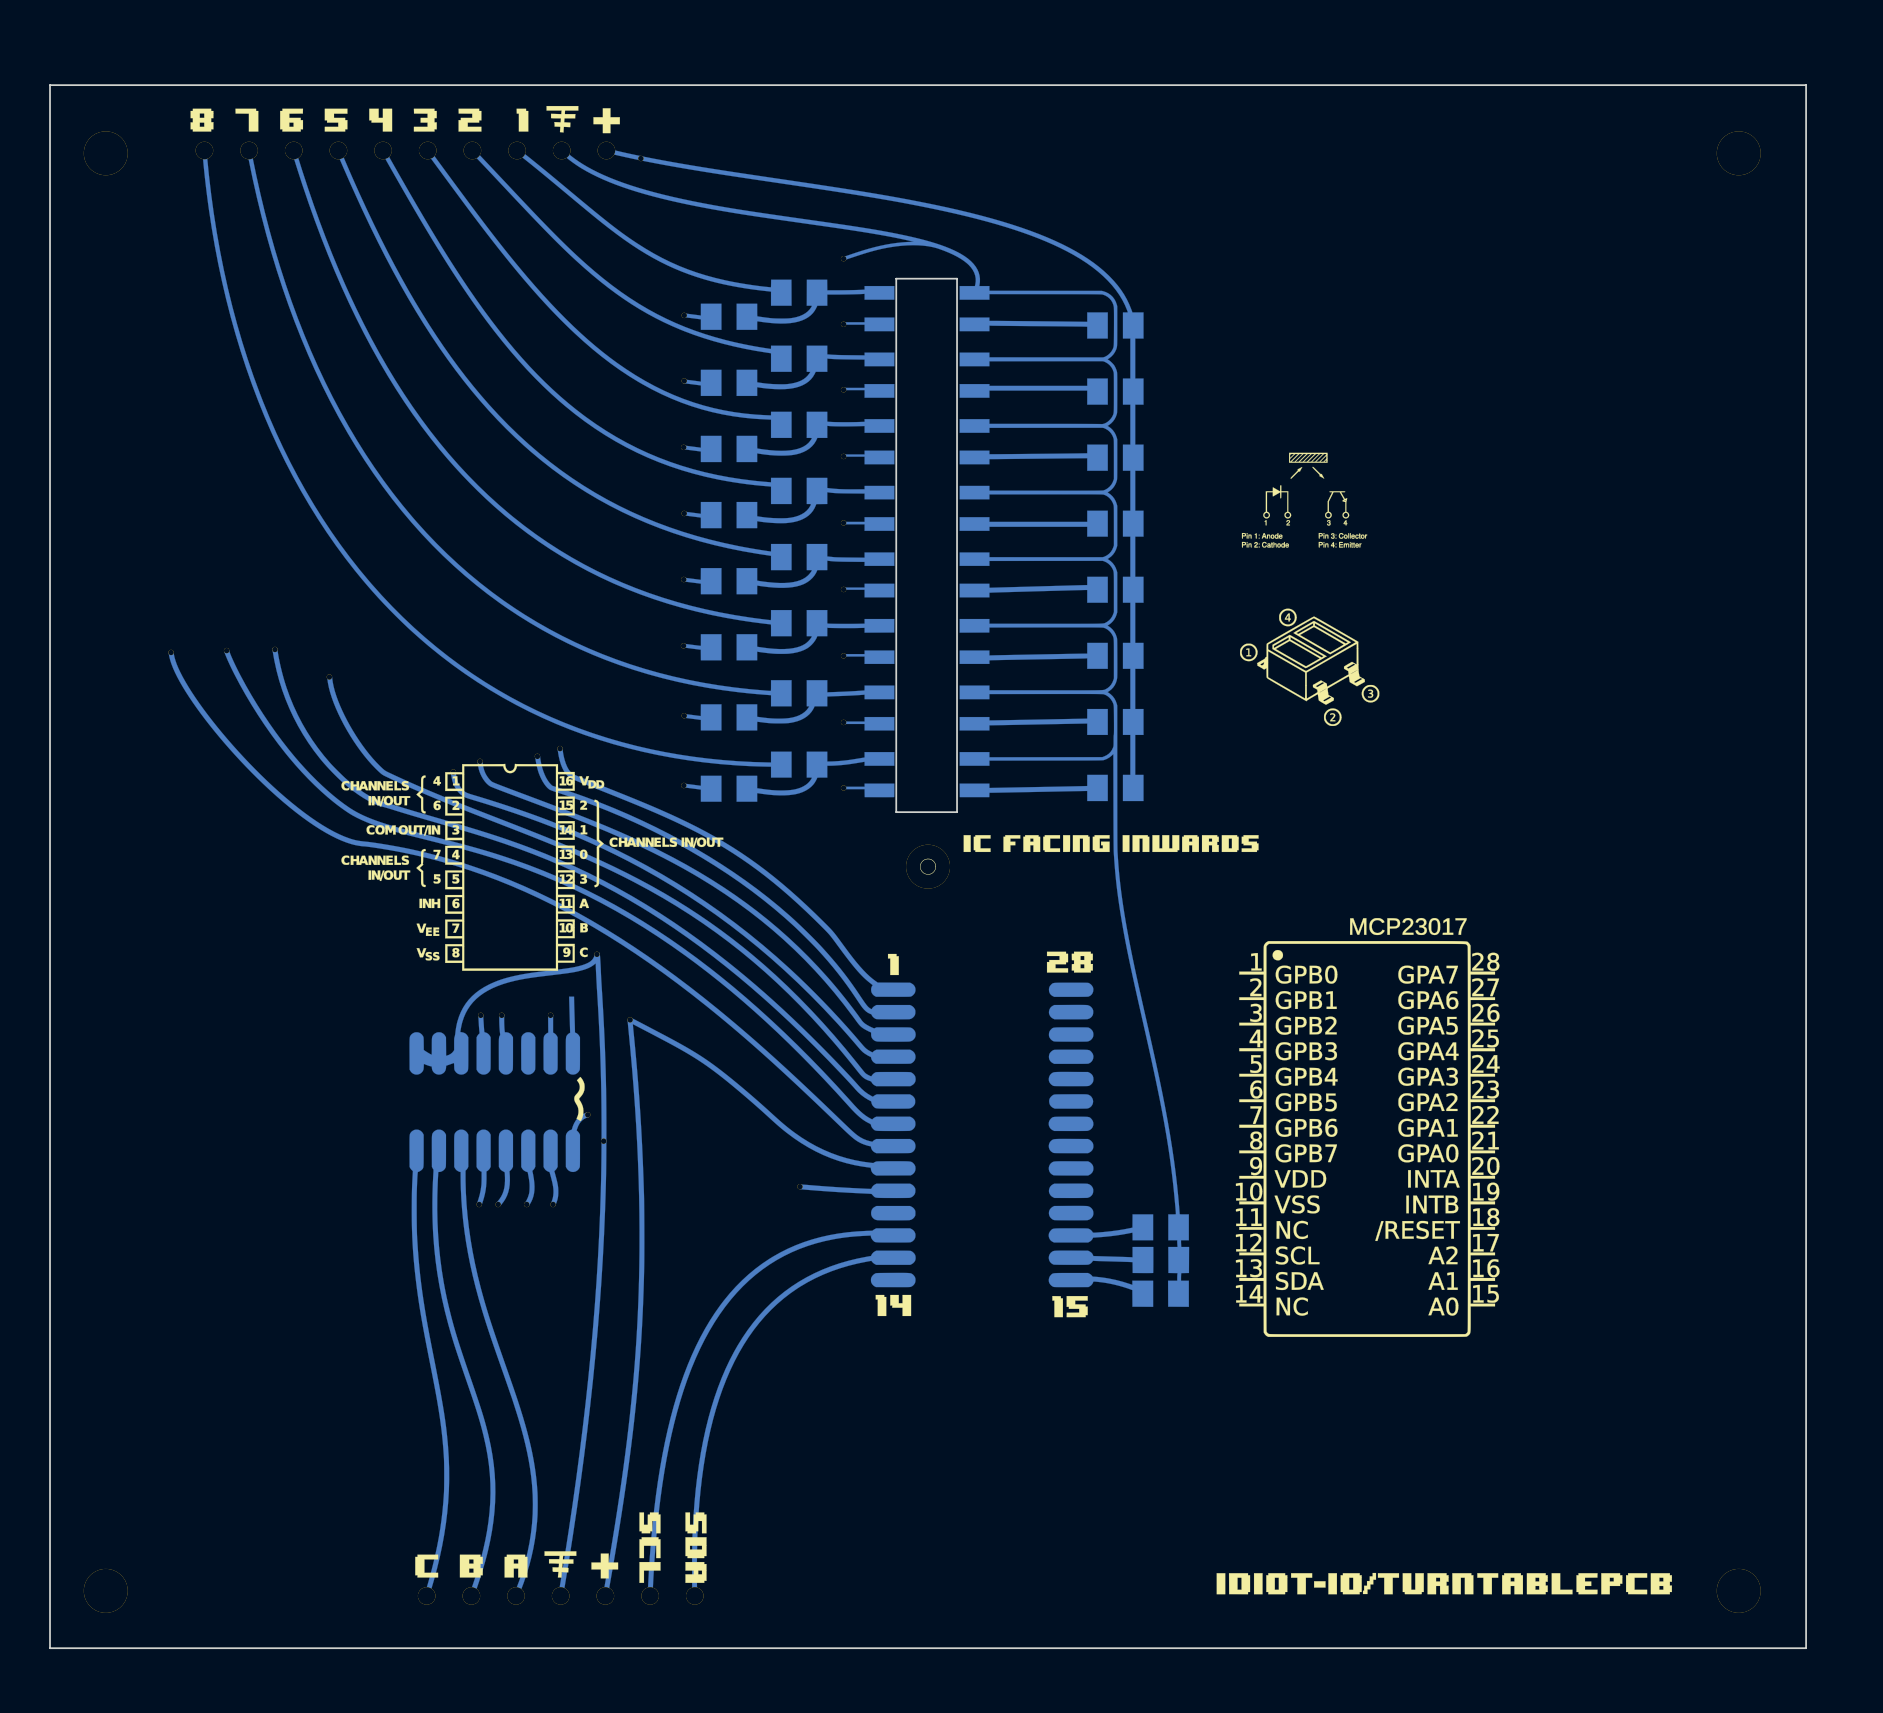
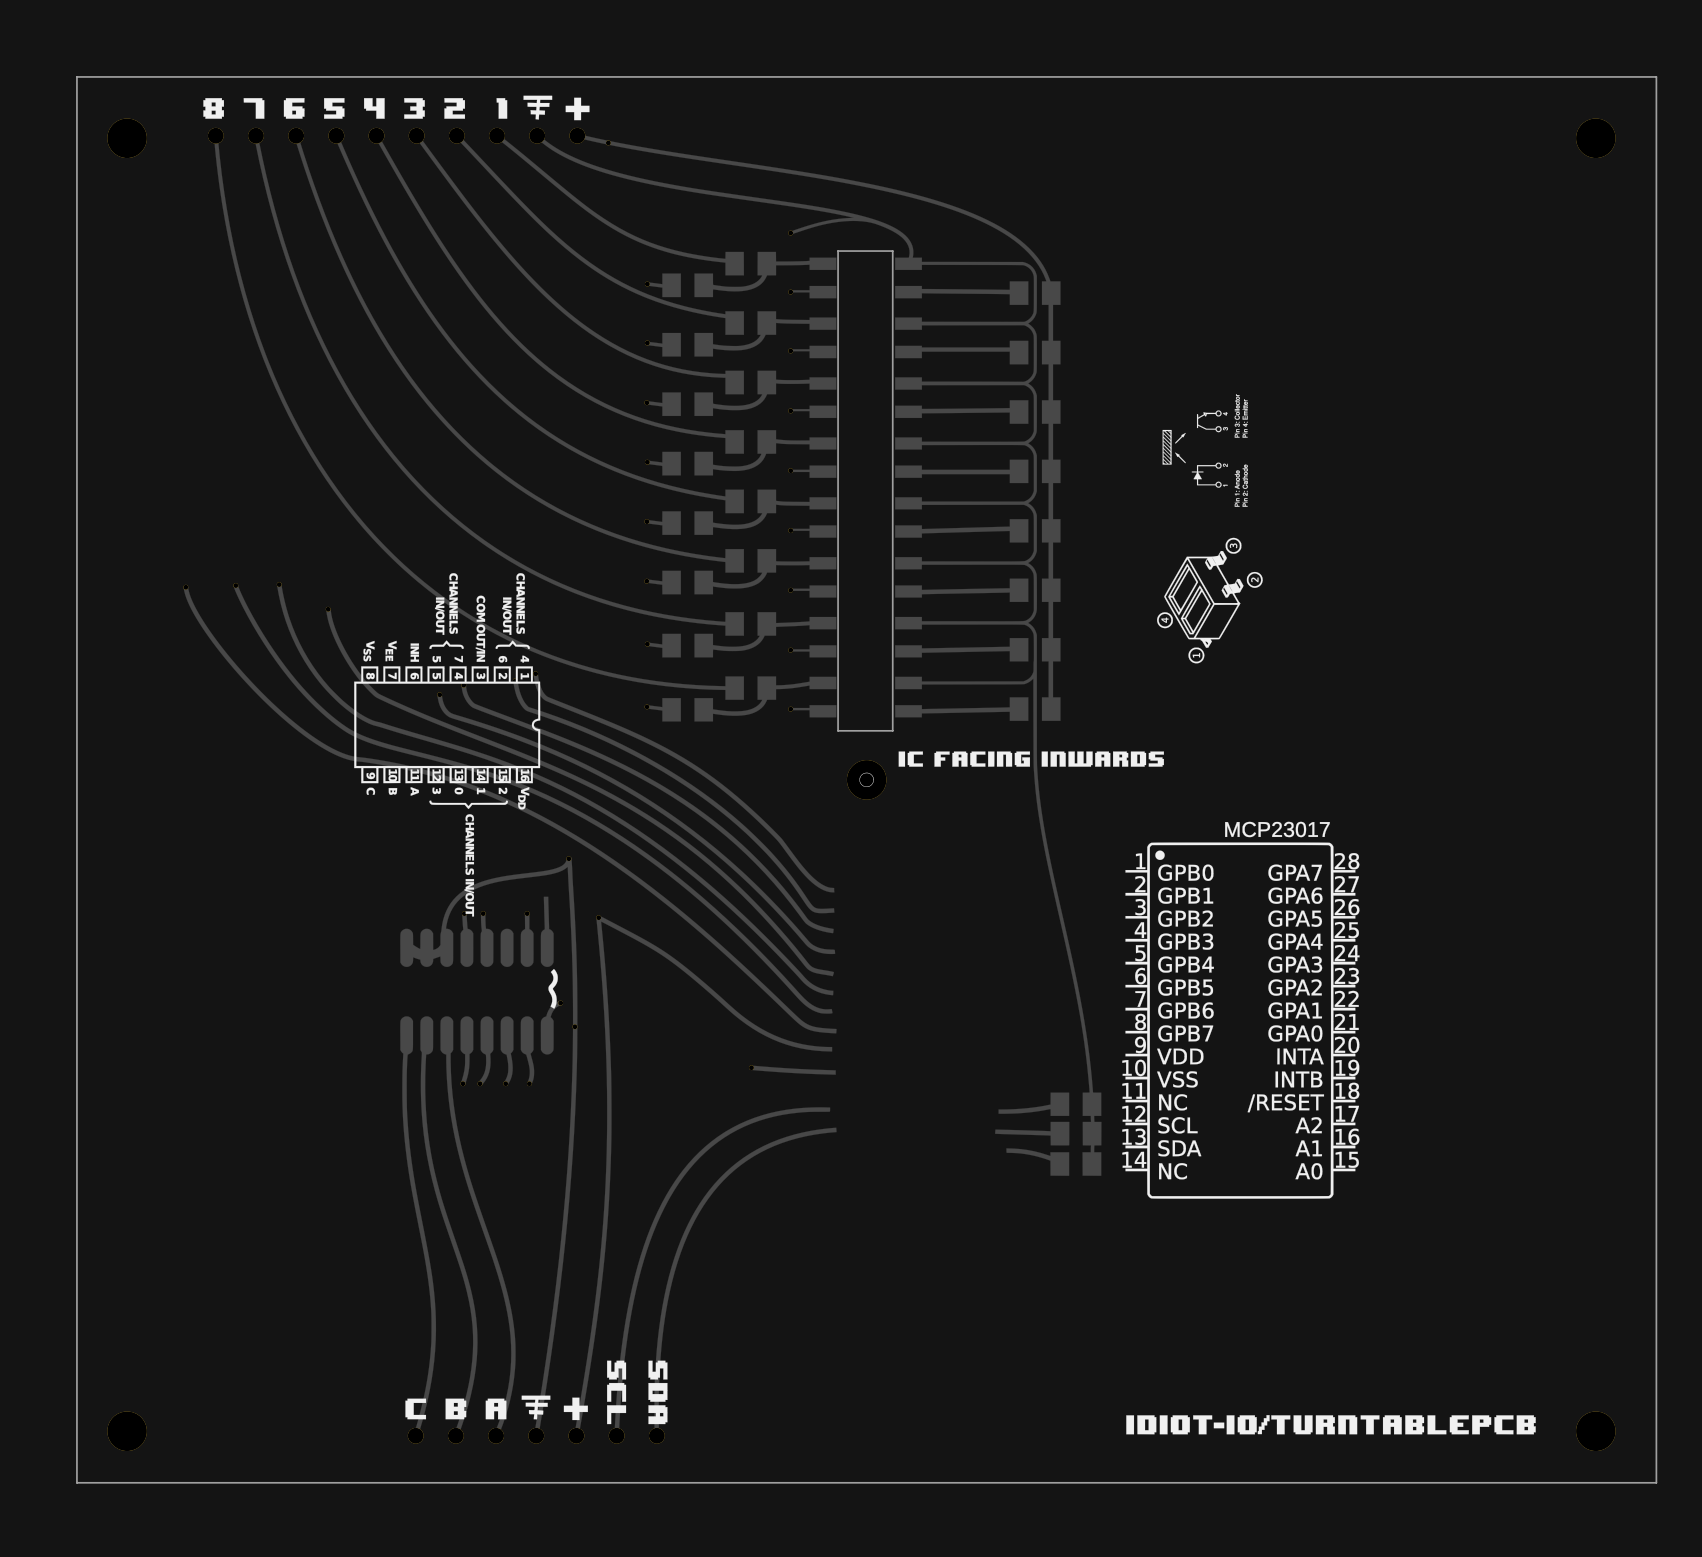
drawing shape: [190, 105, 1672, 1595] -> [203, 95, 1536, 1435]
drawing shape: [168, 148, 1190, 1597] -> [183, 133, 1102, 1437]

